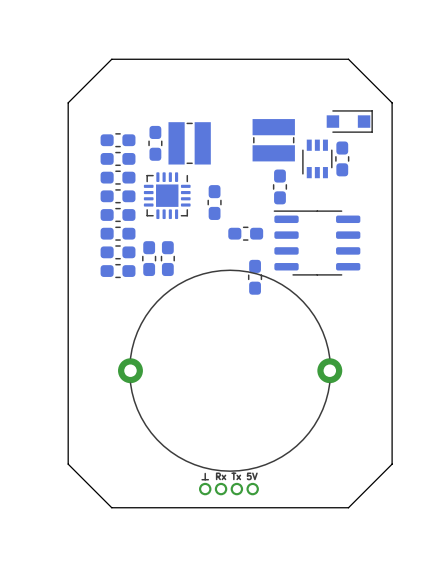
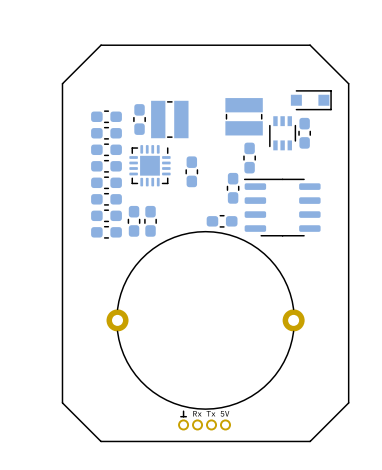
part: none -> (233, 188)
part: (245, 233) -> none
part: none -> (222, 221)
part: (255, 277) -> none

